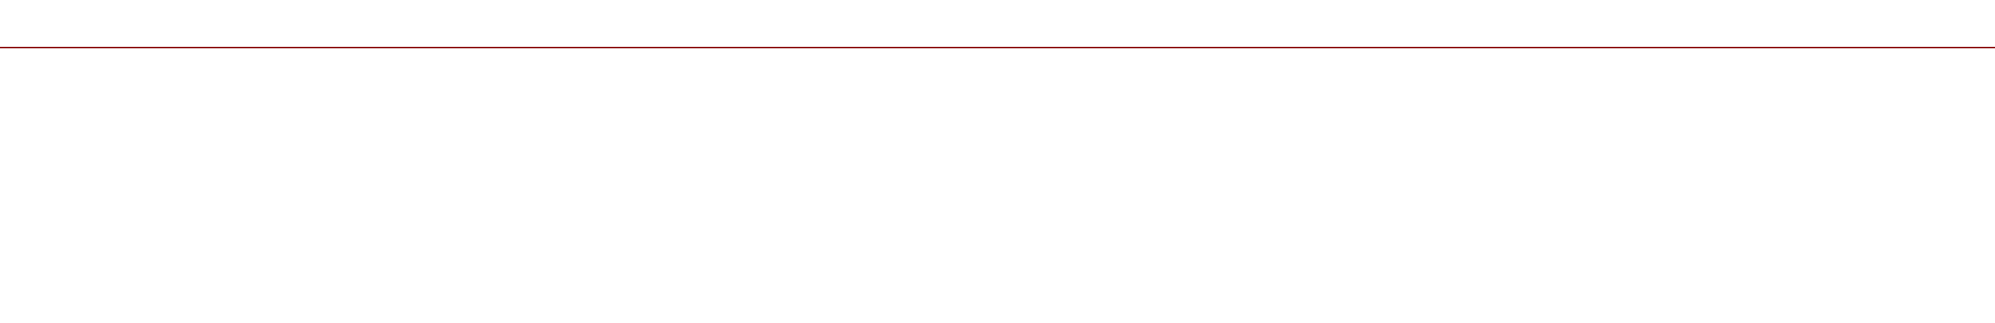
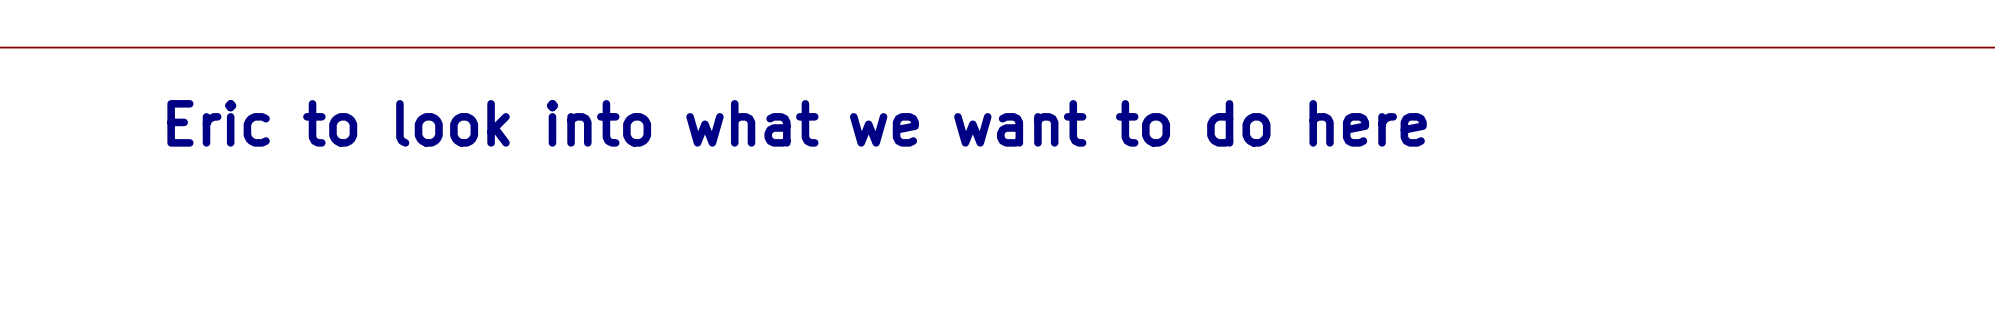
text: none -> Eric to look into what we want to do here (797, 123)

